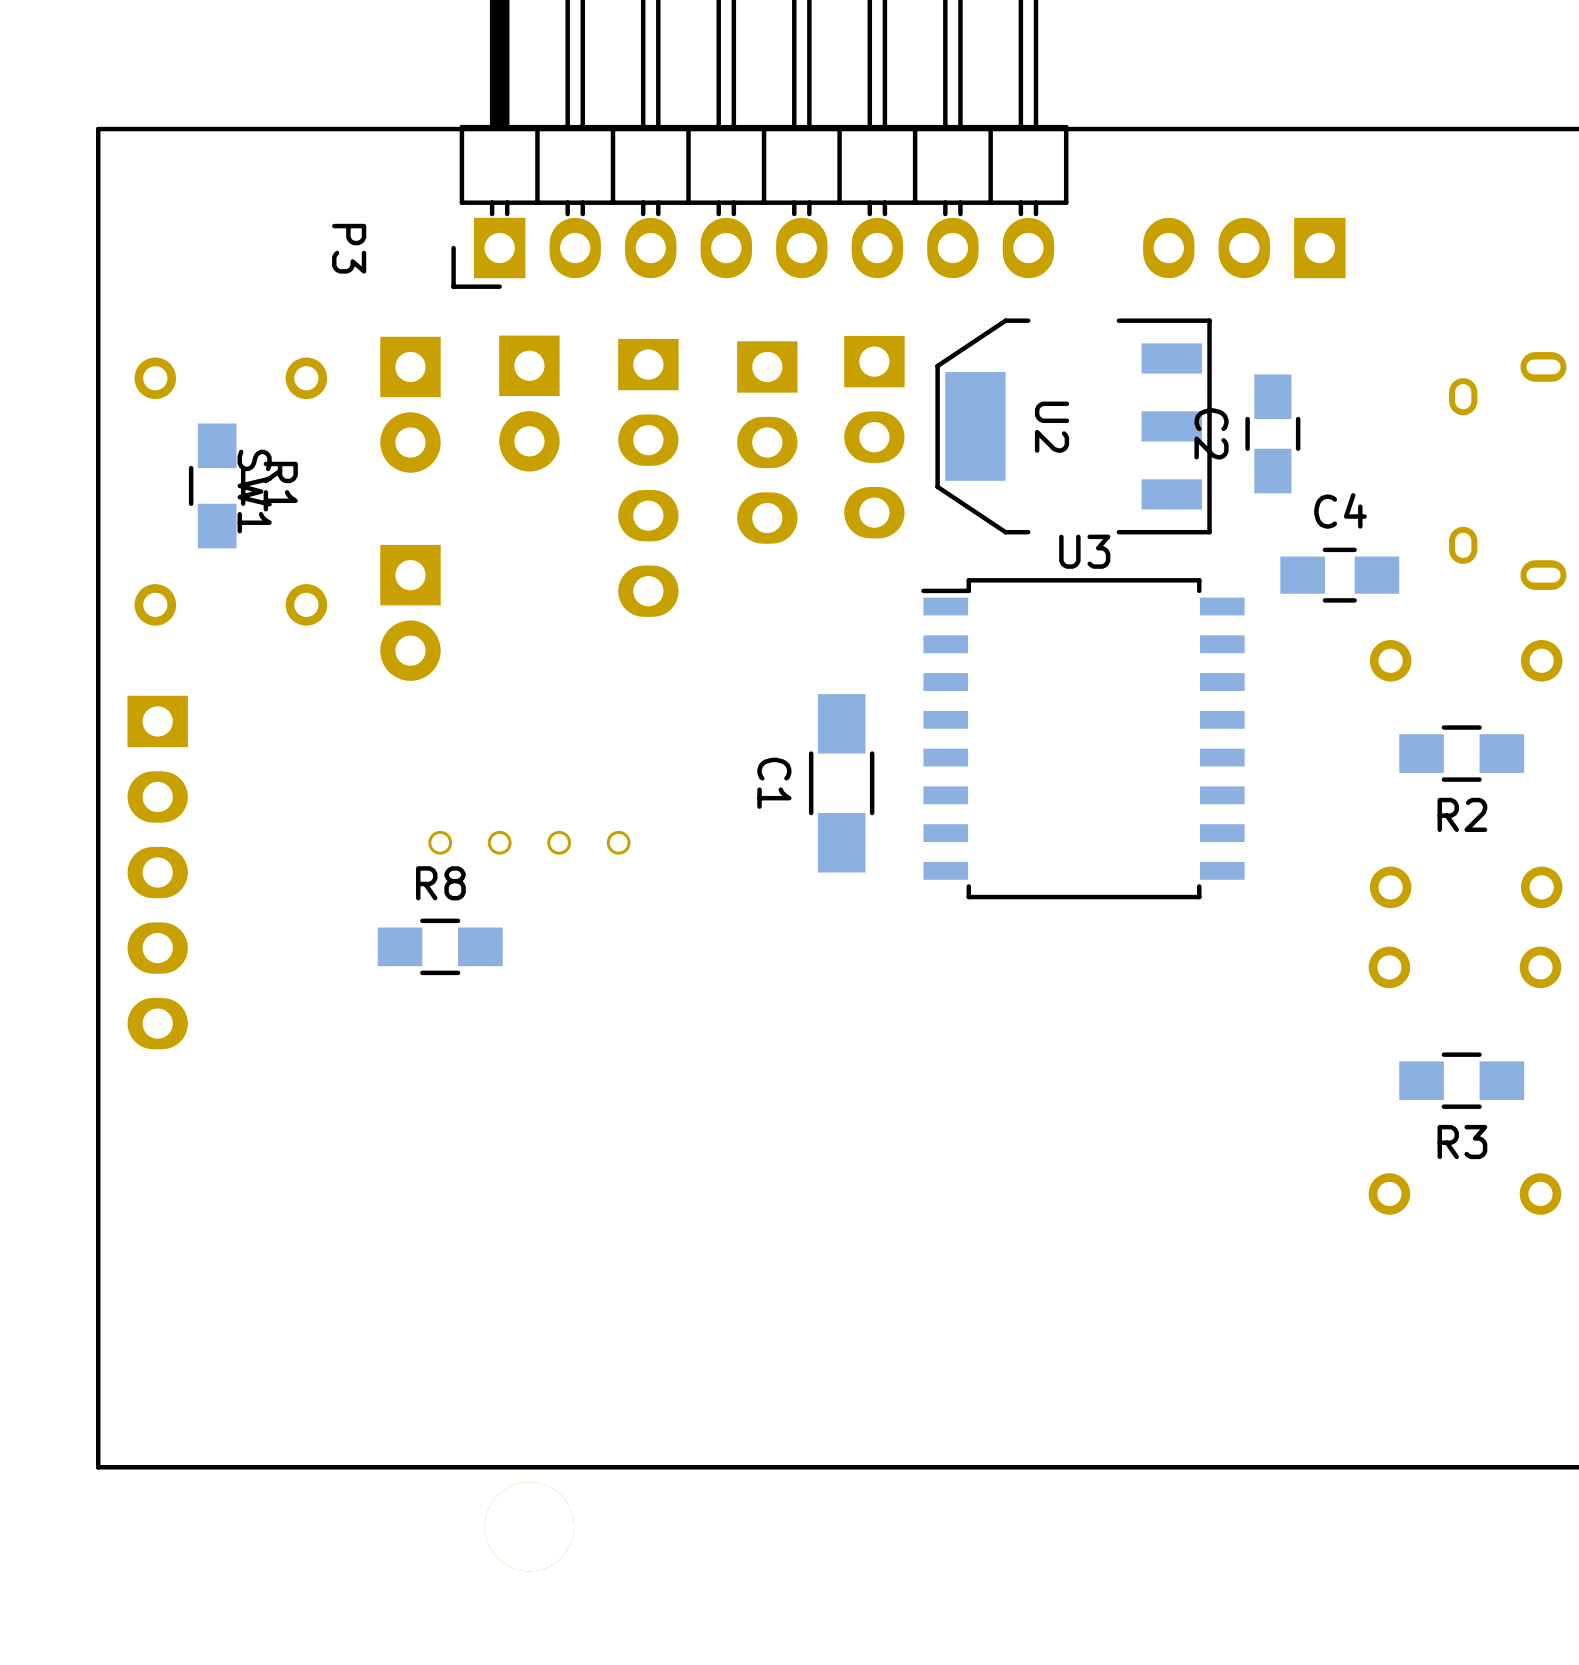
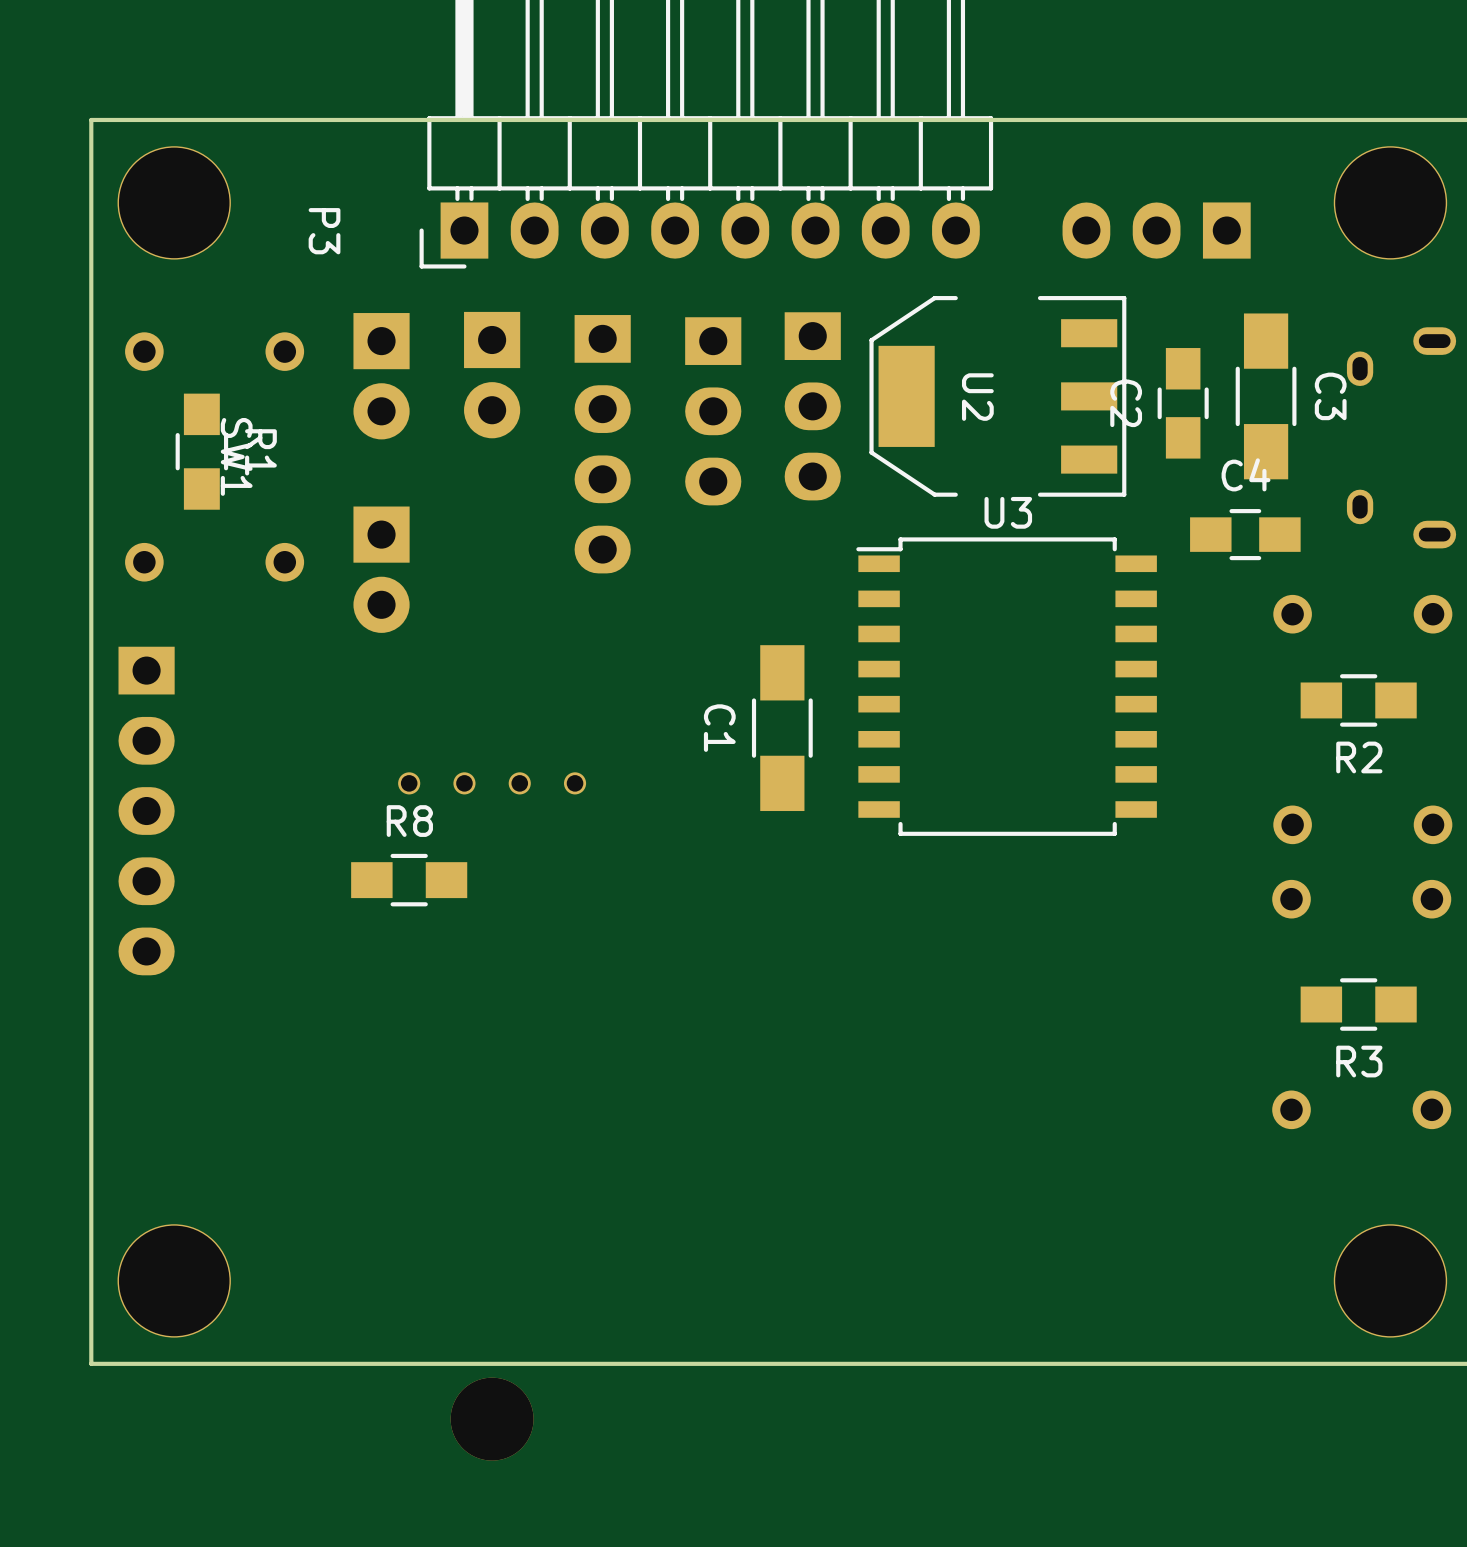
part: none -> (174, 202)
part: none -> (1390, 202)
C3: none -> (1266, 396)
part: none -> (174, 1280)
part: none -> (1390, 1280)

